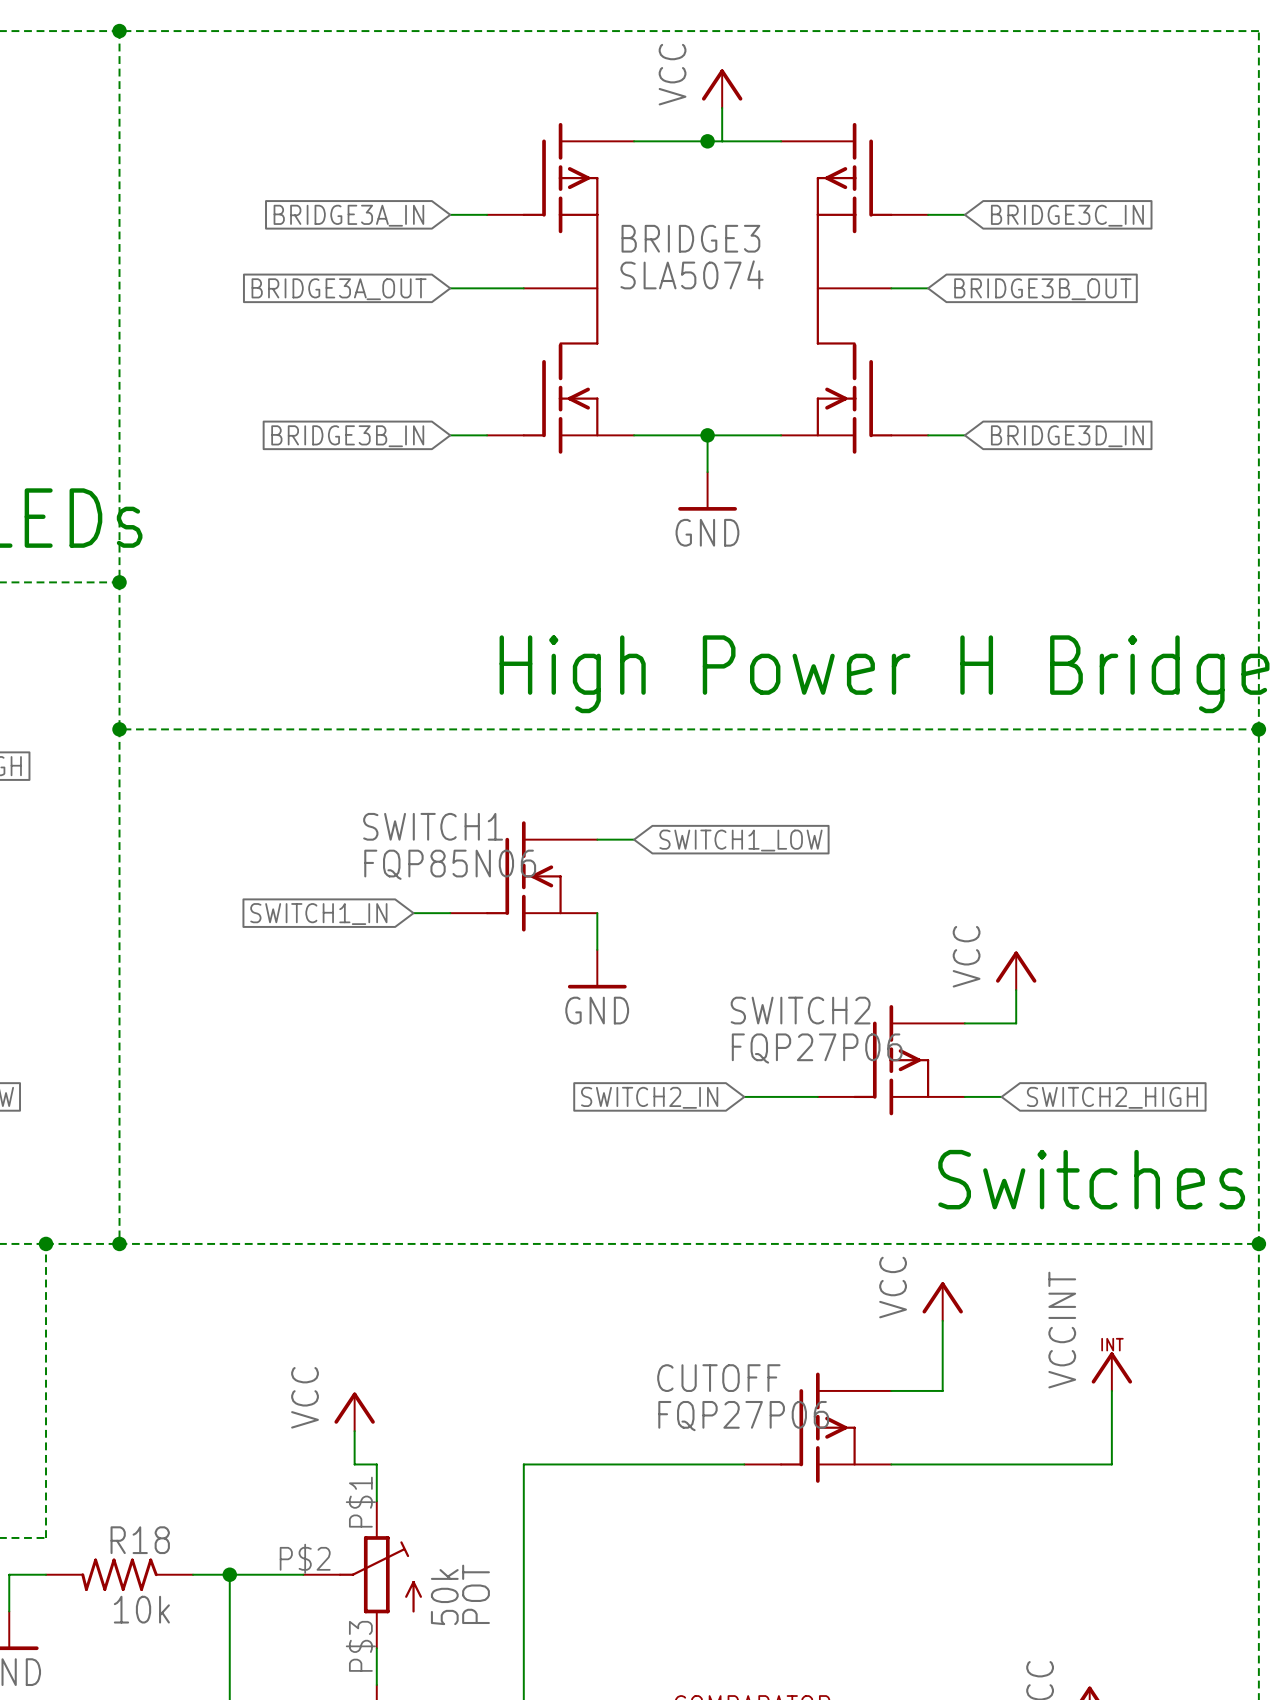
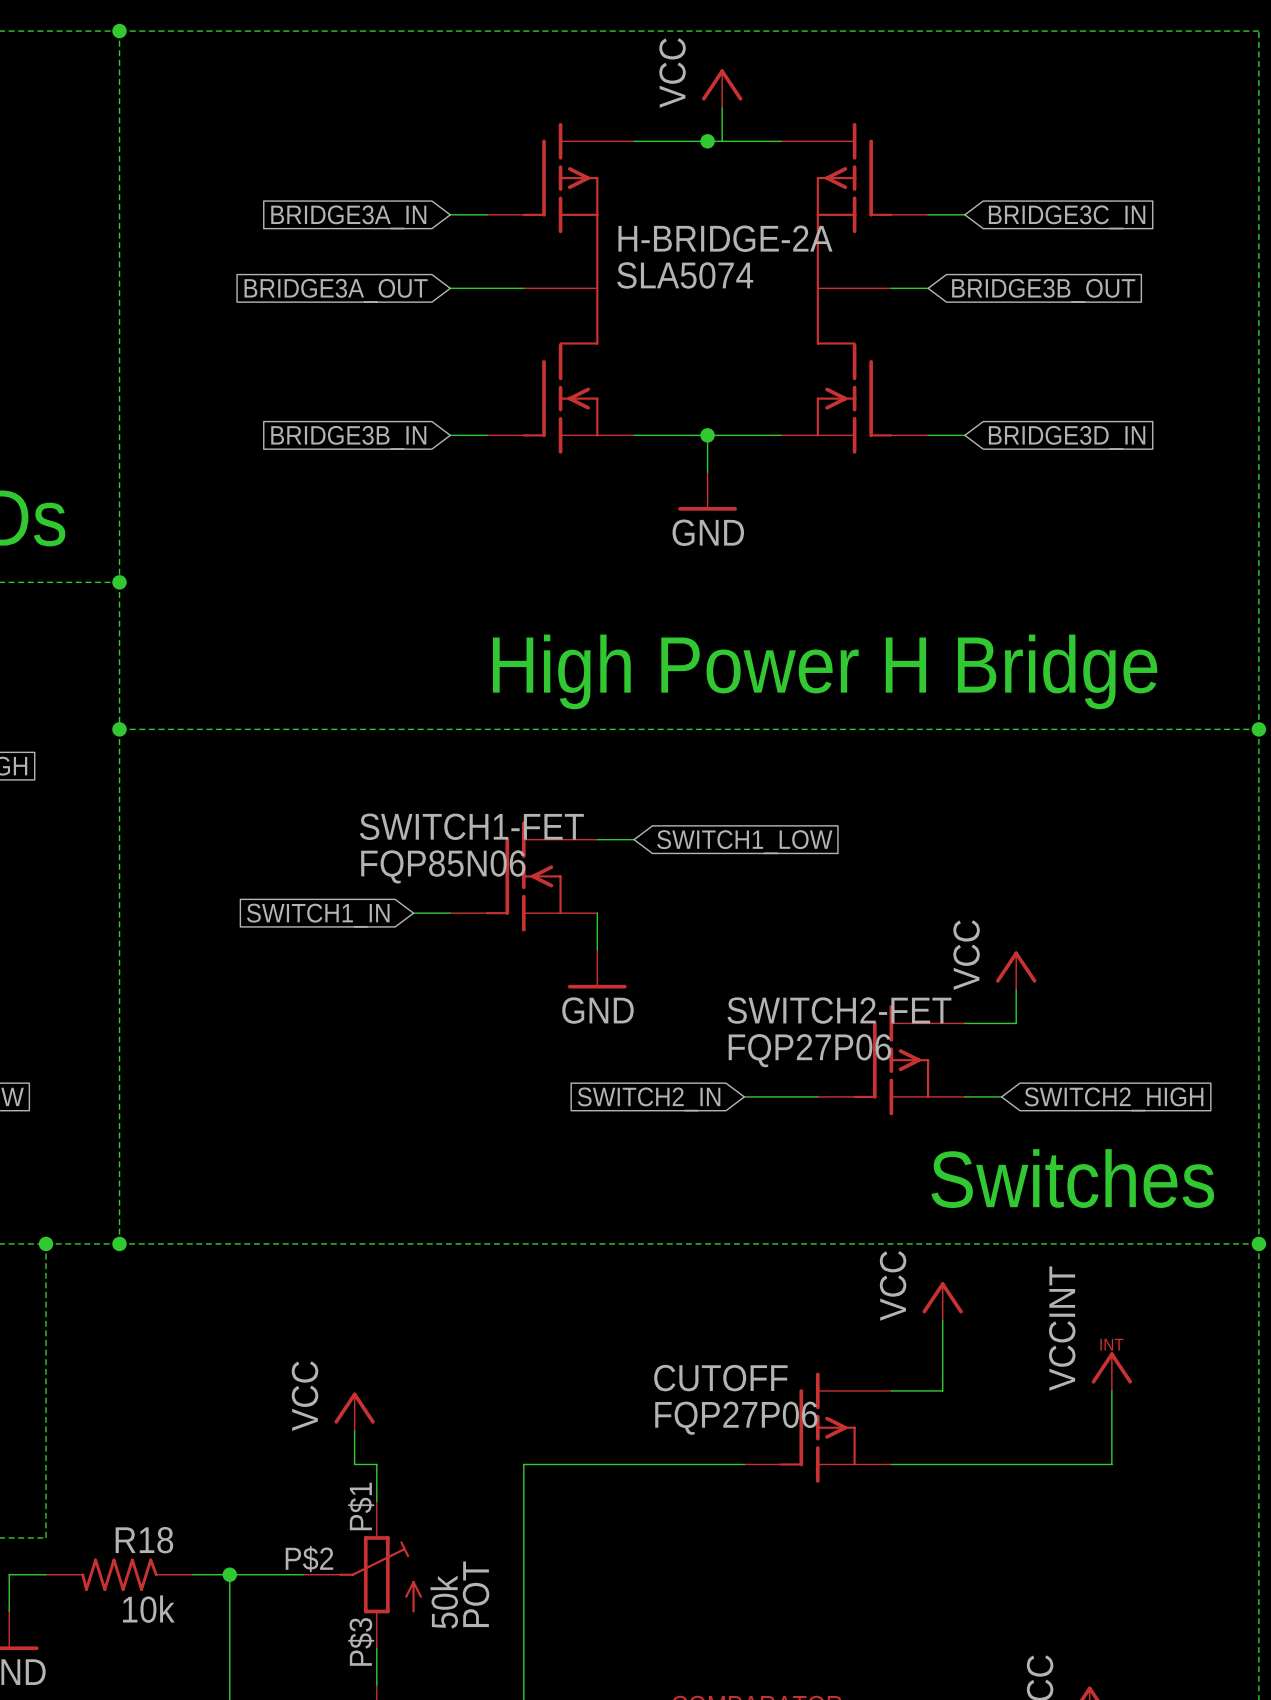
BRIDGE3 name: BRIDGE3 (690, 238) -> H-BRIDGE-2A (725, 238)
SWITCH1 name: SWITCH1 (433, 826) -> SWITCH1-FET (471, 826)
SWITCH2 name: SWITCH2 (800, 1010) -> SWITCH2-FET (839, 1010)

